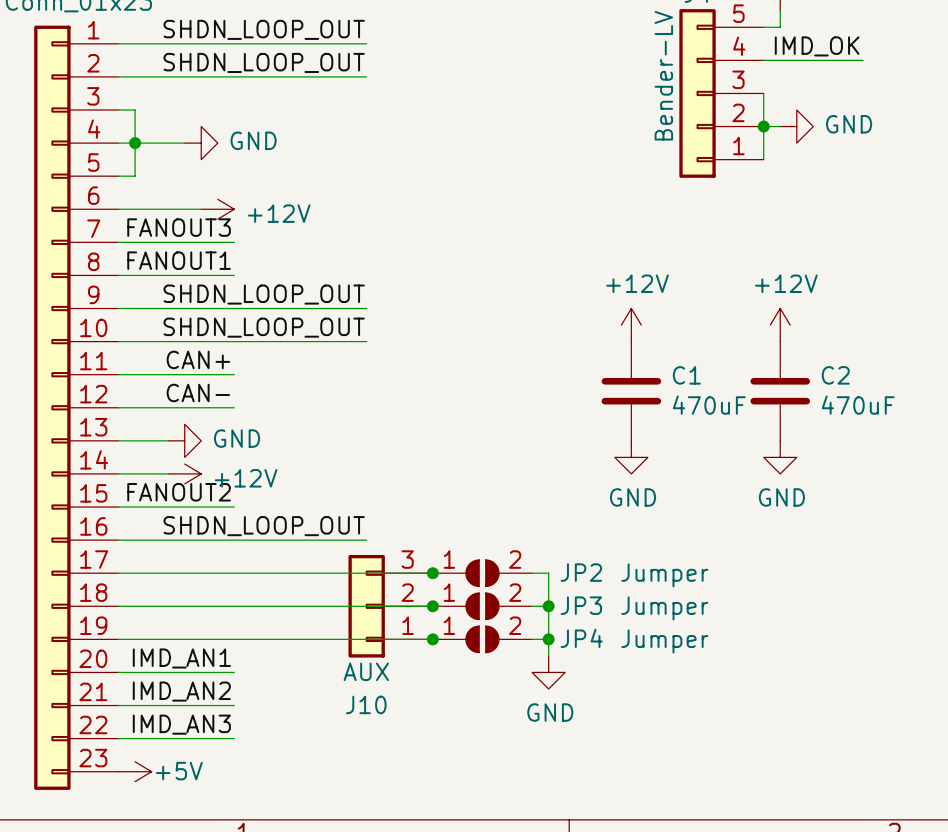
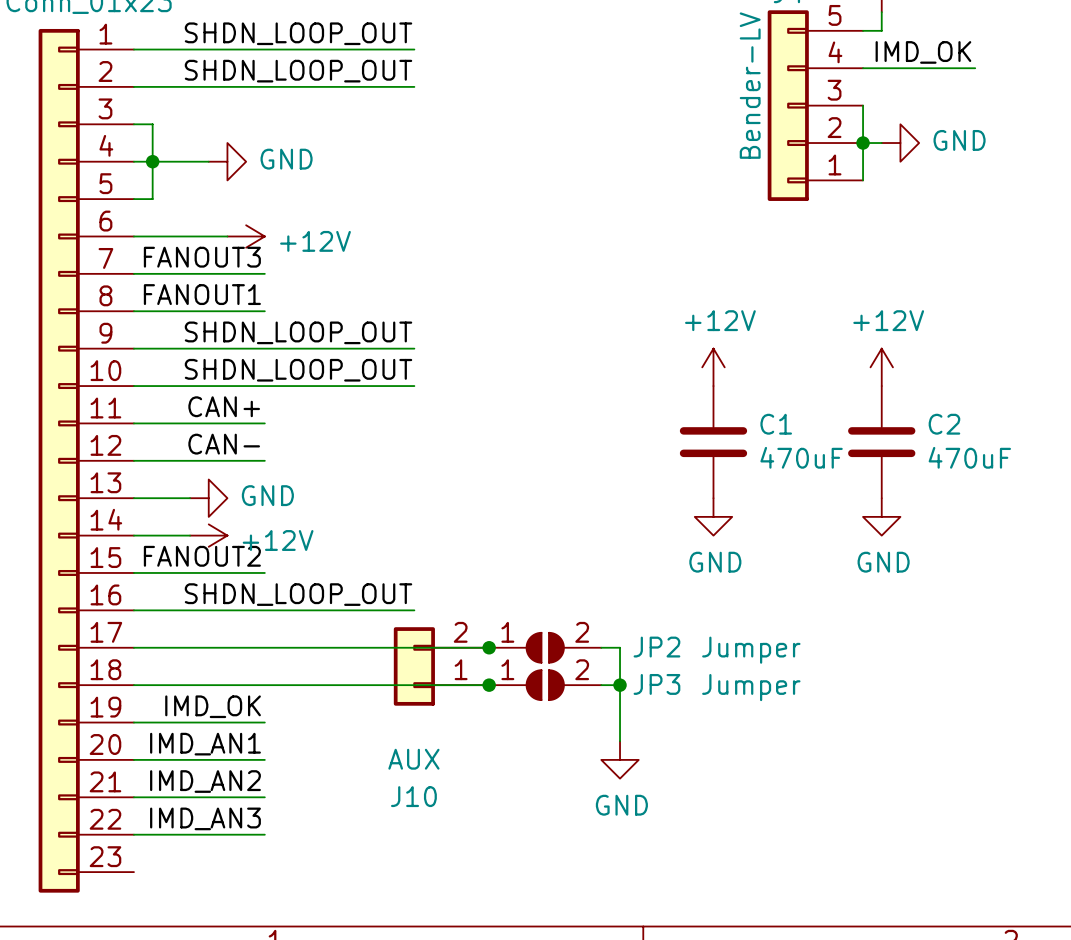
J10 symbol: [348, 555, 433, 658] -> [393, 627, 490, 706]
label: none -> IMD_OK (213, 706)
wire: (234, 639) (432, 639) -> none
junction: (432, 639) -> none
JP4: Jumper (482, 639) -> none
wire: (532, 639) (548, 639) -> none
junction: (548, 639) -> none
power symbol: +5V (135, 771) -> none

